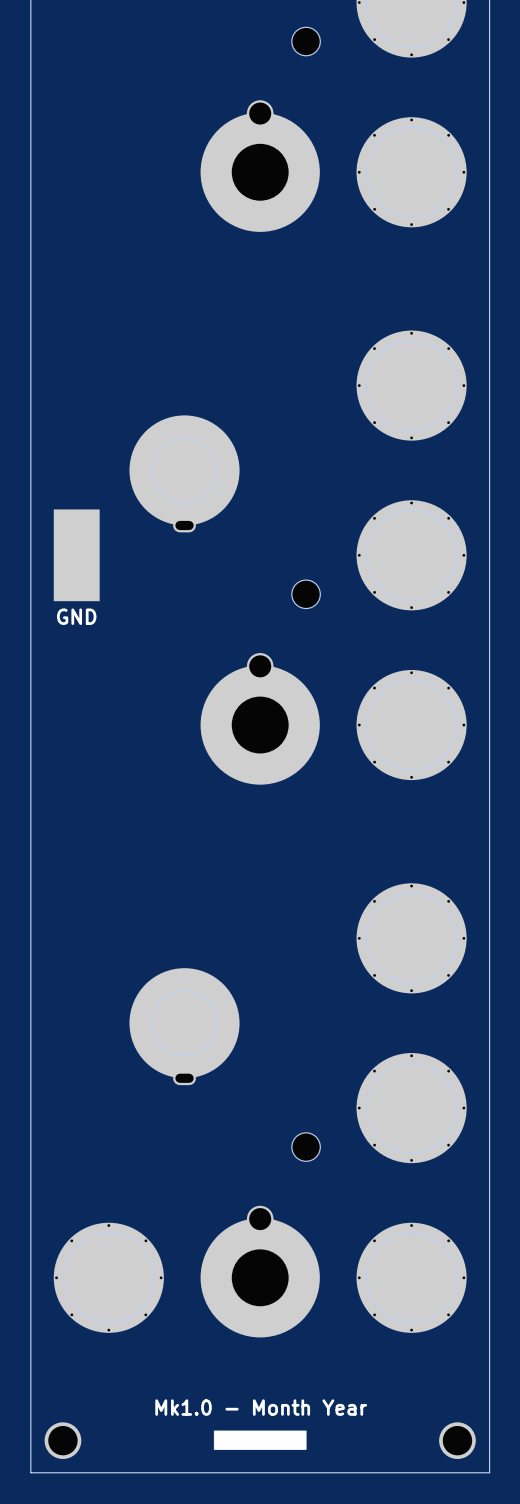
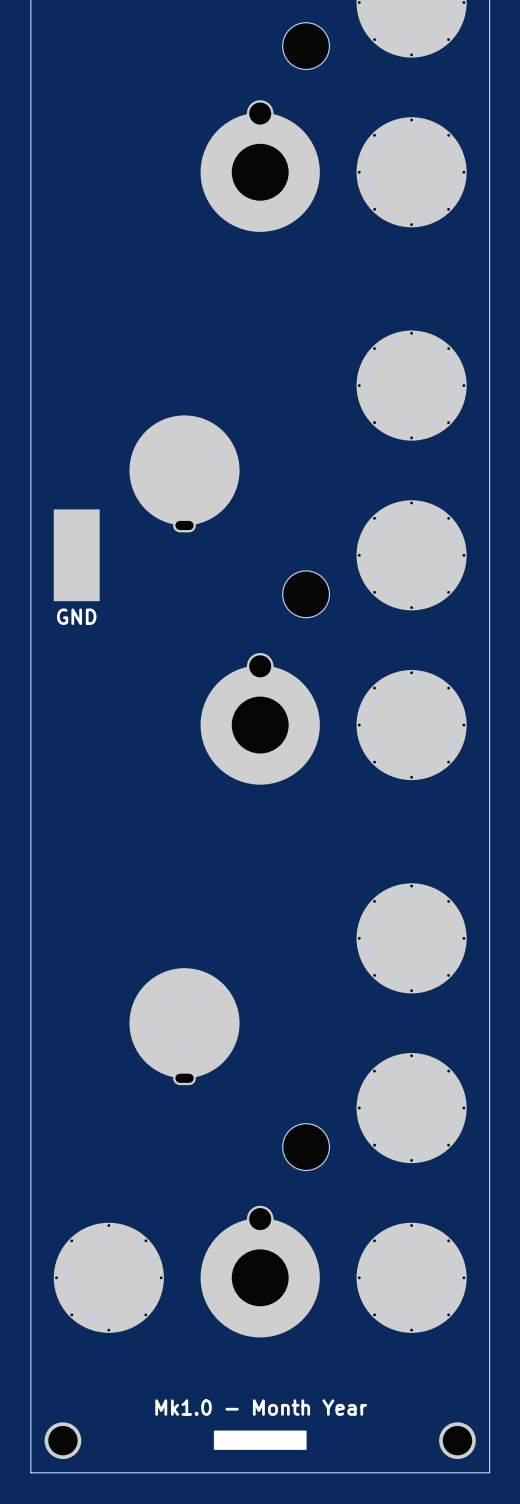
part footprint: [291, 27, 321, 56] -> [282, 22, 330, 70]
part footprint: [291, 580, 321, 609] -> [282, 570, 330, 618]
part footprint: [291, 1132, 321, 1162] -> [282, 1123, 330, 1171]

